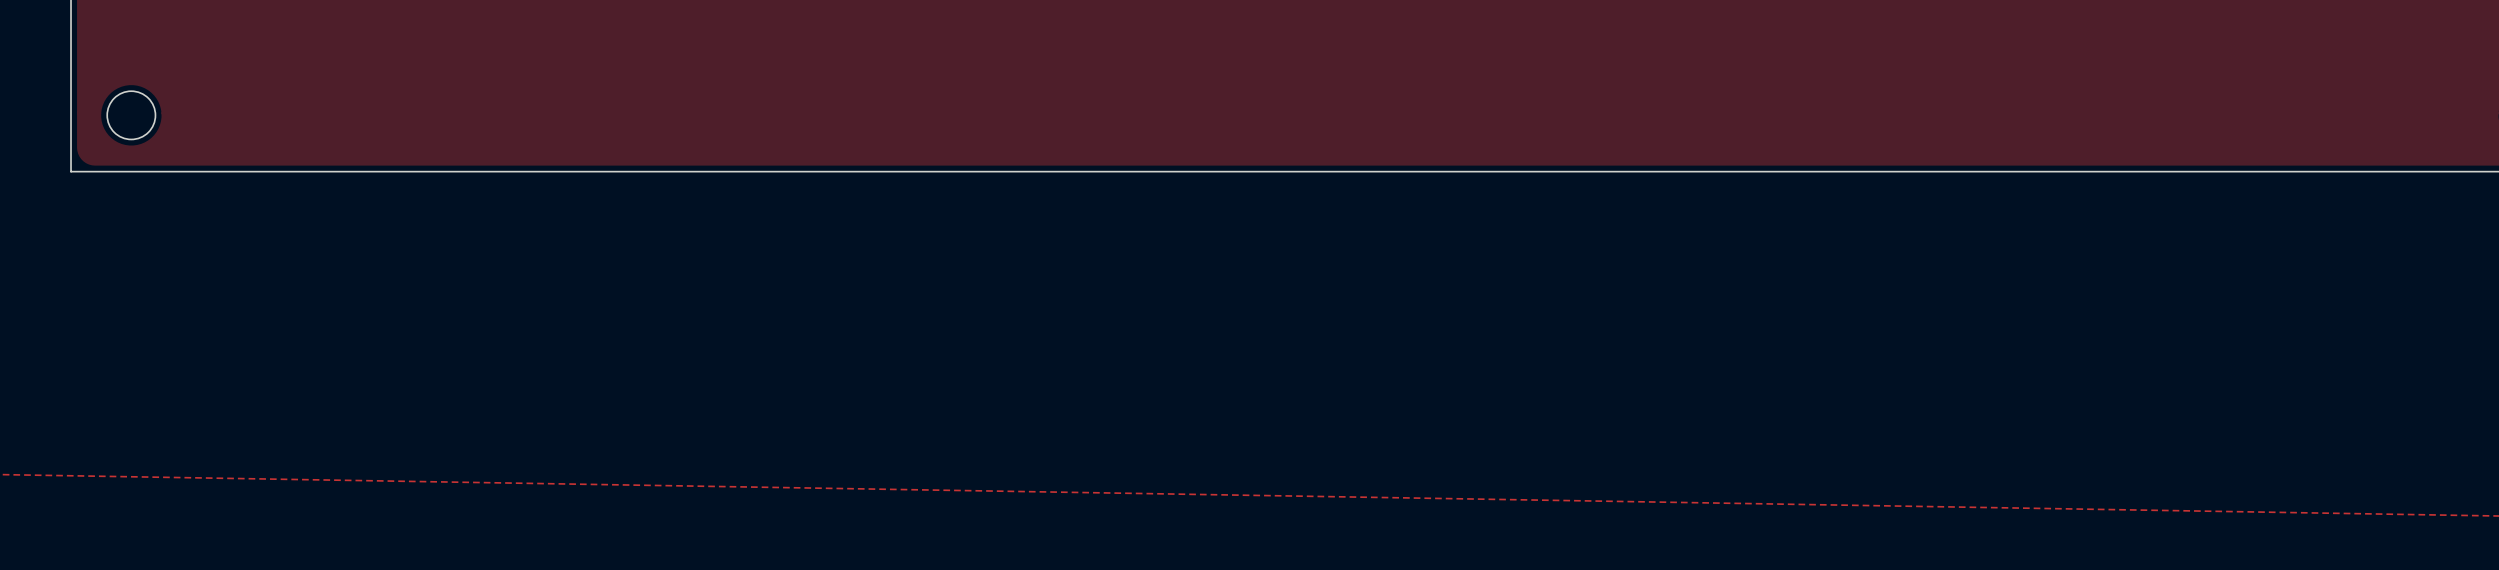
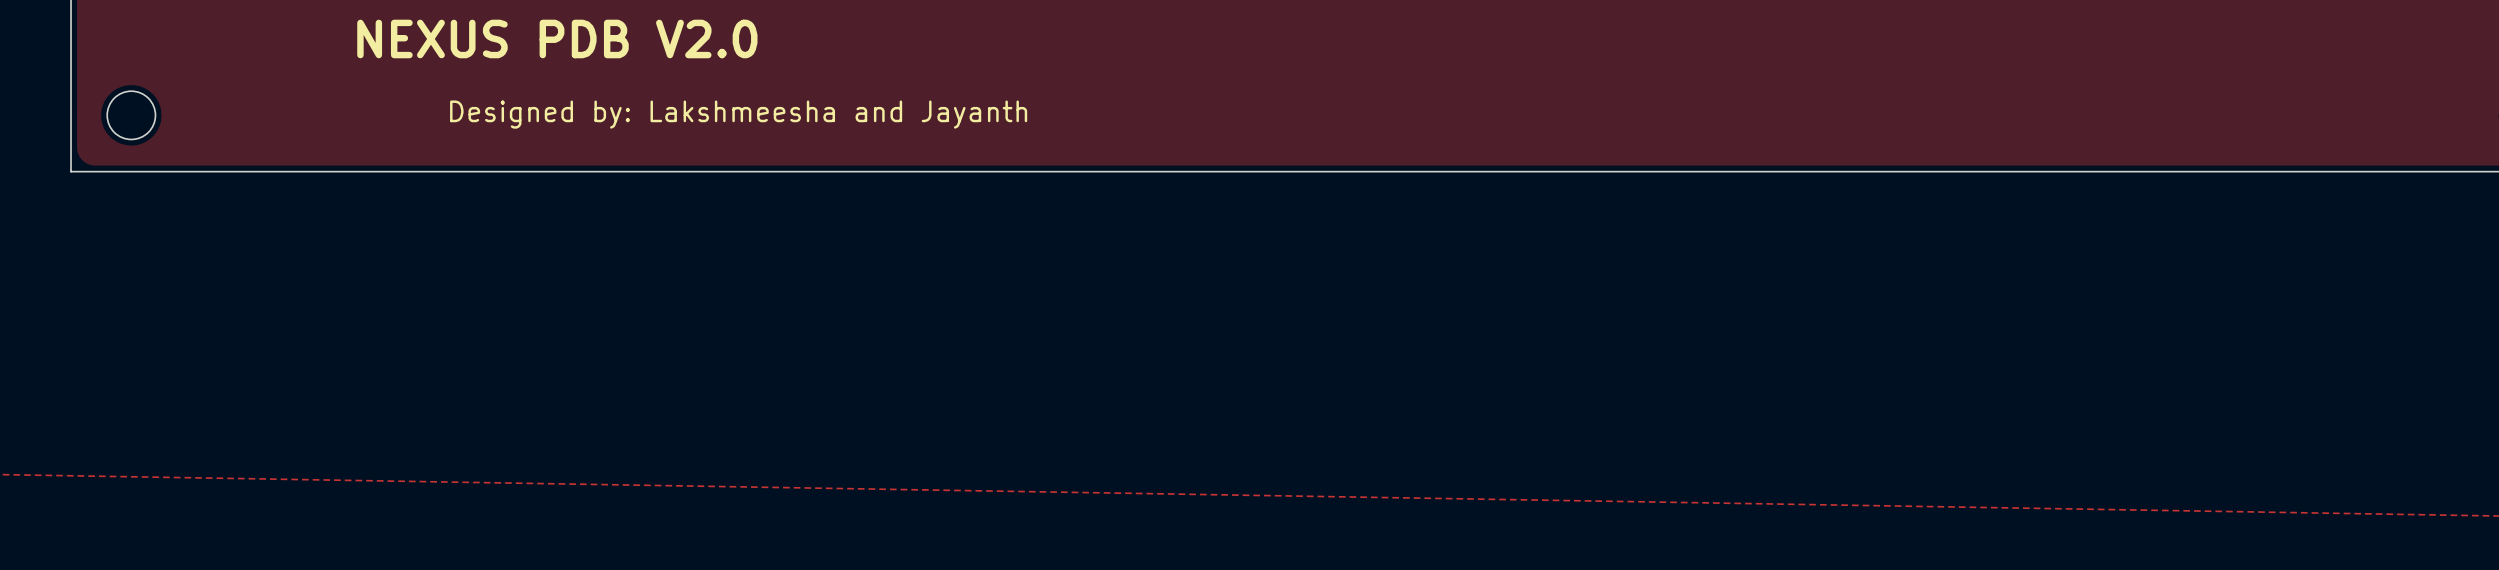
text: none -> NEXUS PDB V2.0 (557, 38)
text: none -> Designed by: Lakshmeesha and Jayanth (738, 114)

